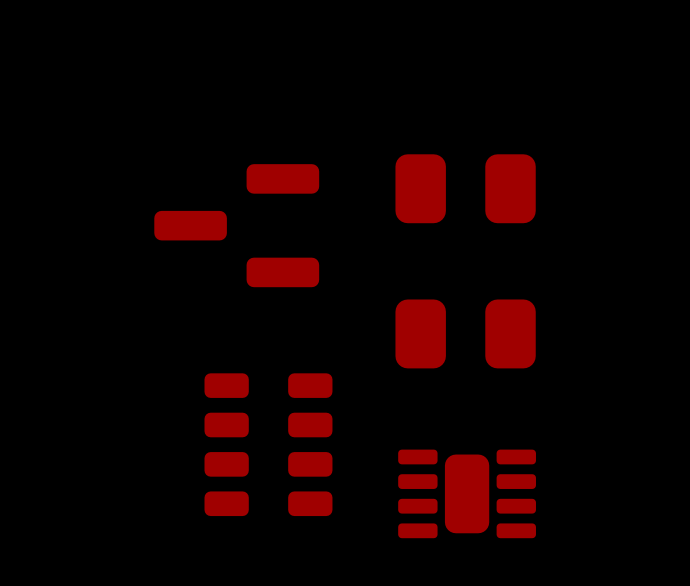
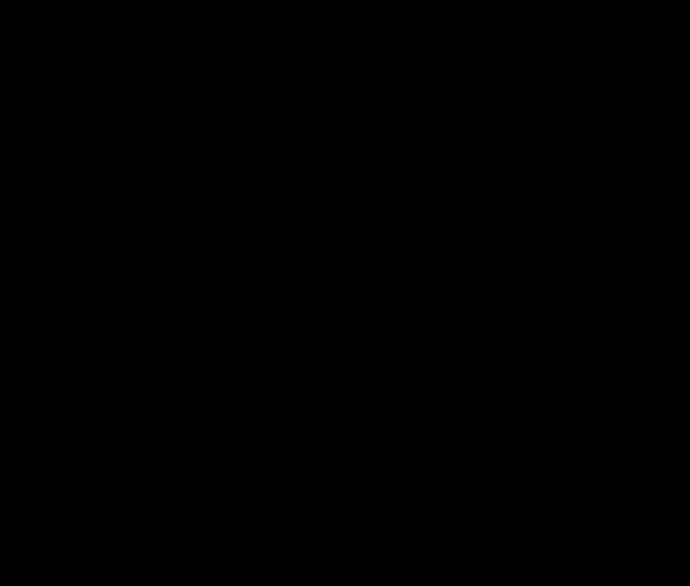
part: (465, 188) -> none
part: (236, 225) -> none
part: (465, 333) -> none
part: (268, 444) -> none
part: (467, 493) -> none

